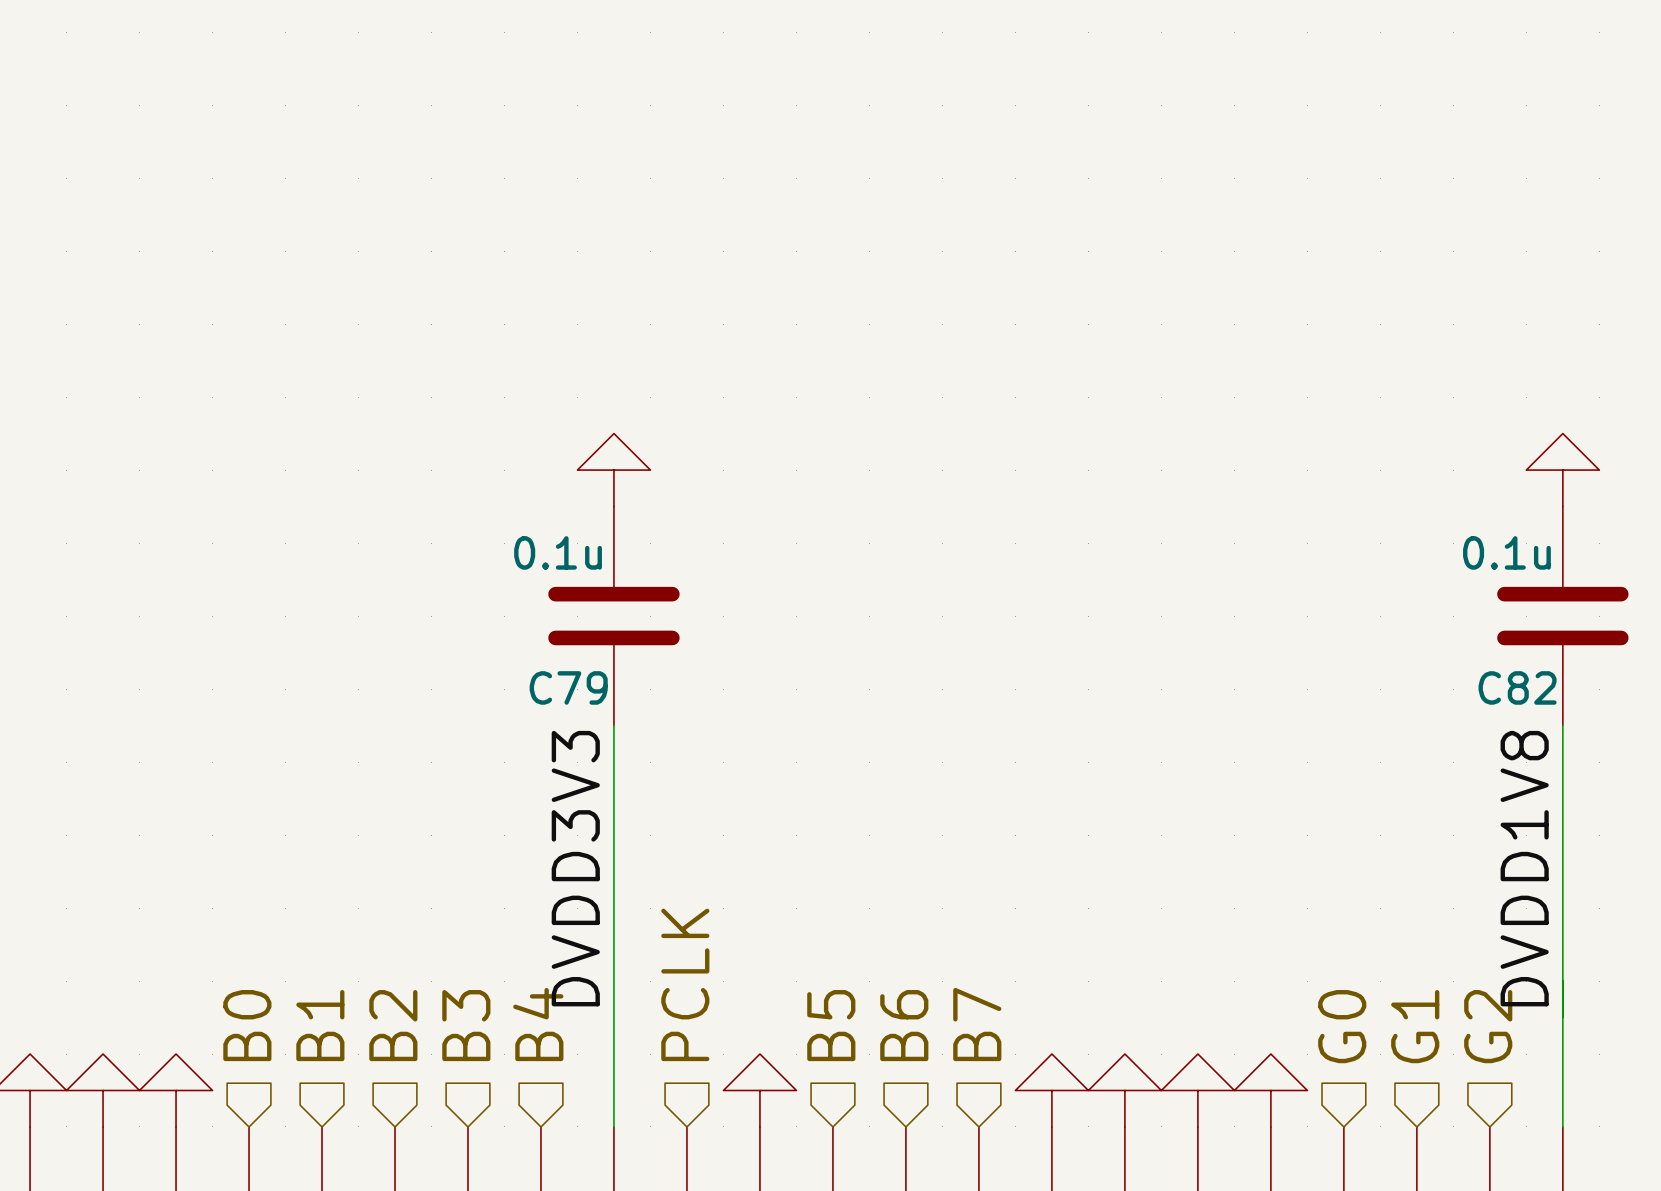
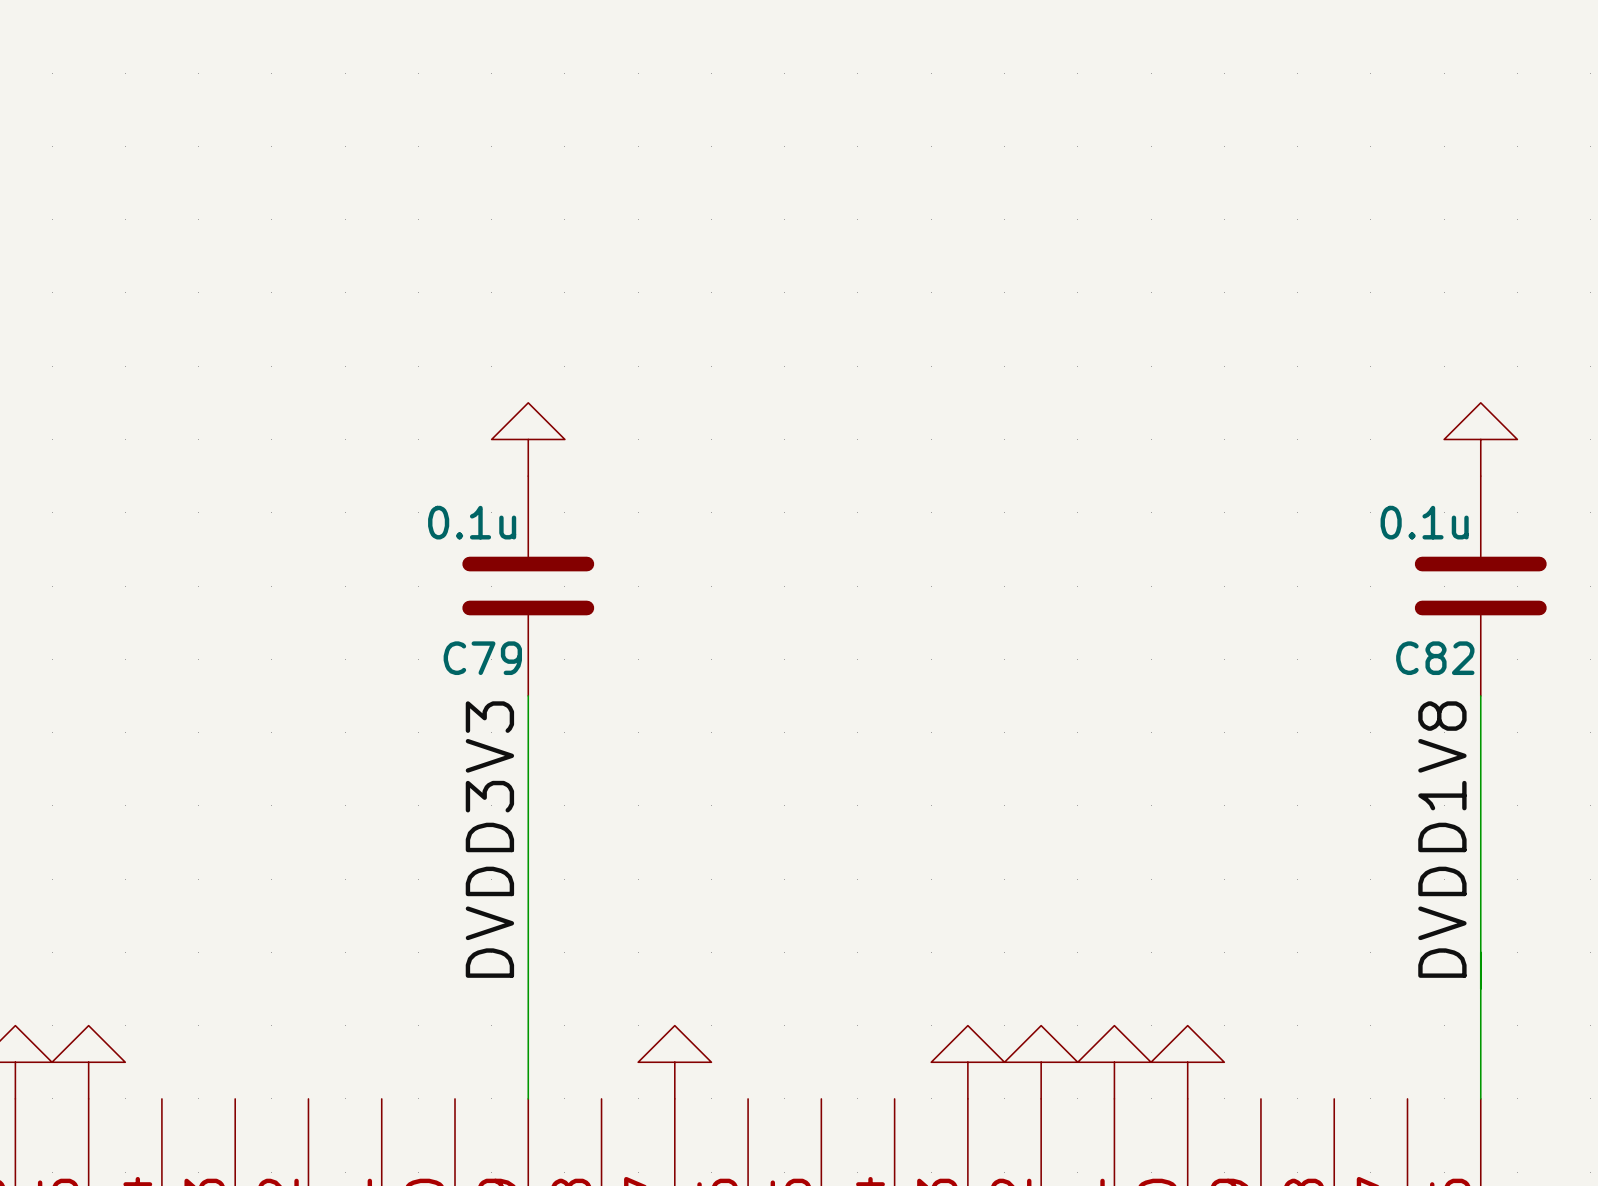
hierarchical label: PCLK (685, 984) -> none
hierarchical label: B4 (538, 1024) -> none
hierarchical label: B7 (977, 1024) -> none
hierarchical label: B0 (247, 1025) -> none
hierarchical label: B1 (320, 1025) -> none
hierarchical label: B2 (393, 1025) -> none
hierarchical label: B3 (466, 1025) -> none
hierarchical label: B5 (831, 1025) -> none
hierarchical label: B6 (904, 1025) -> none
hierarchical label: G0 (1342, 1026) -> none
hierarchical label: G1 (1415, 1026) -> none
hierarchical label: G2 (1488, 1026) -> none

